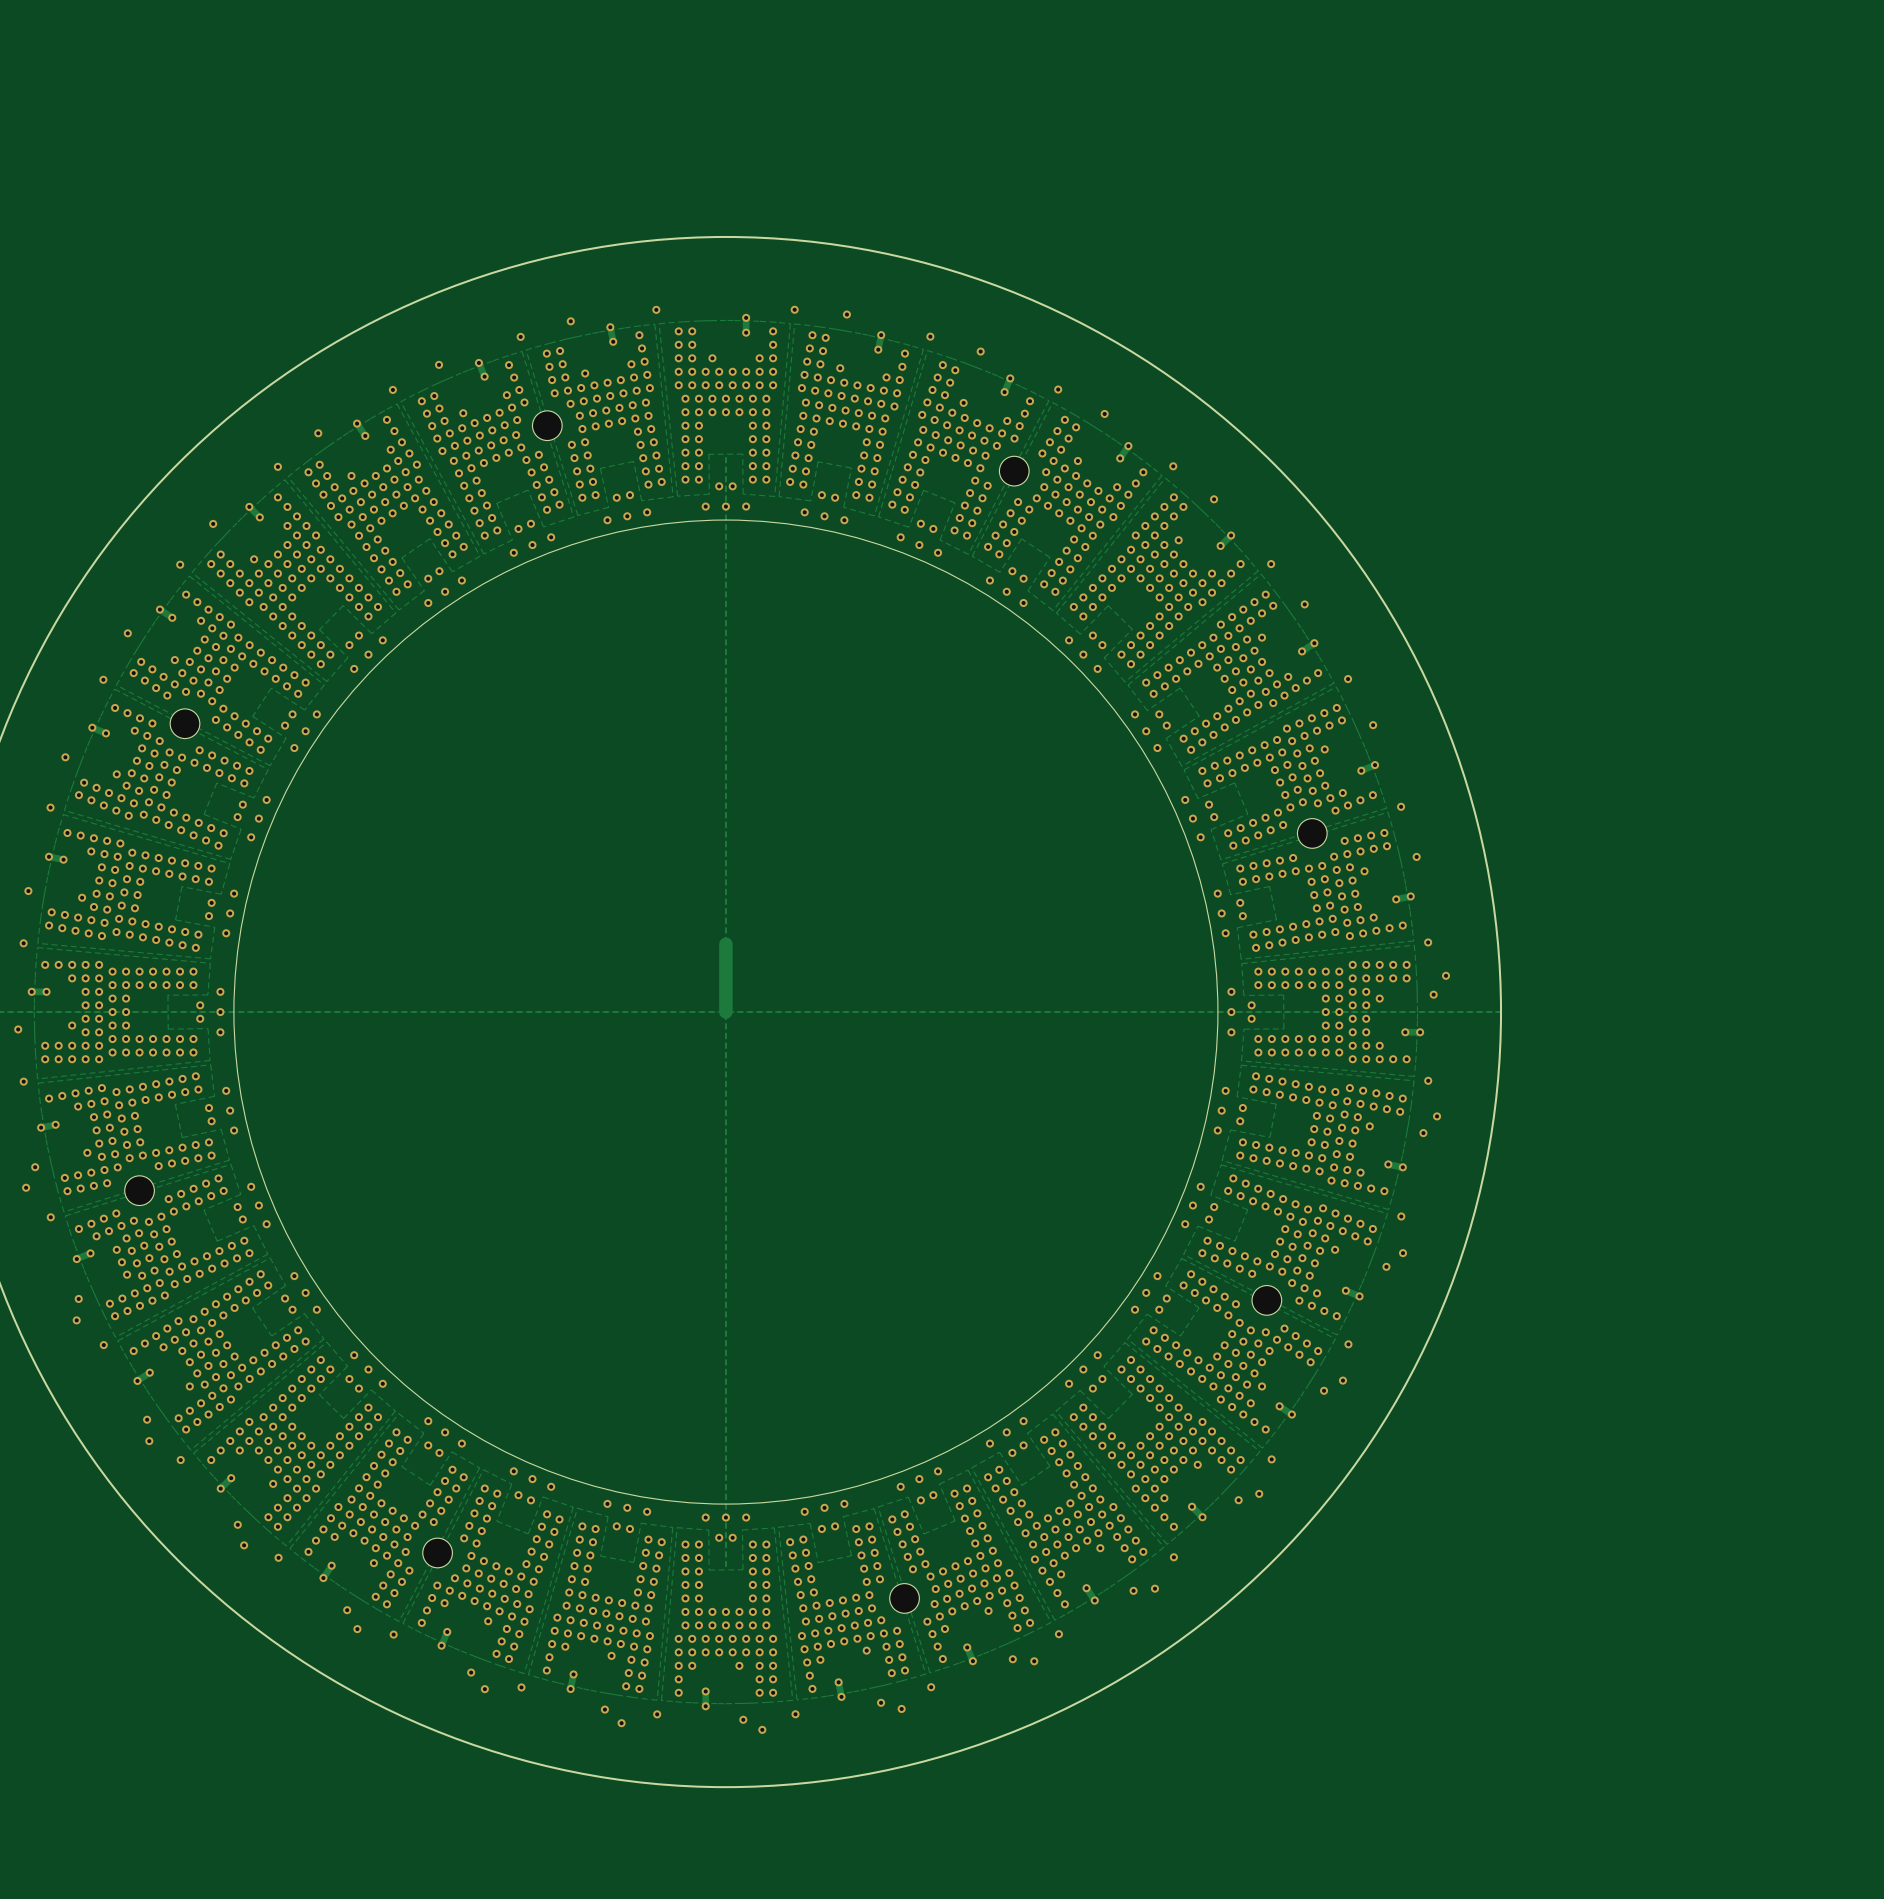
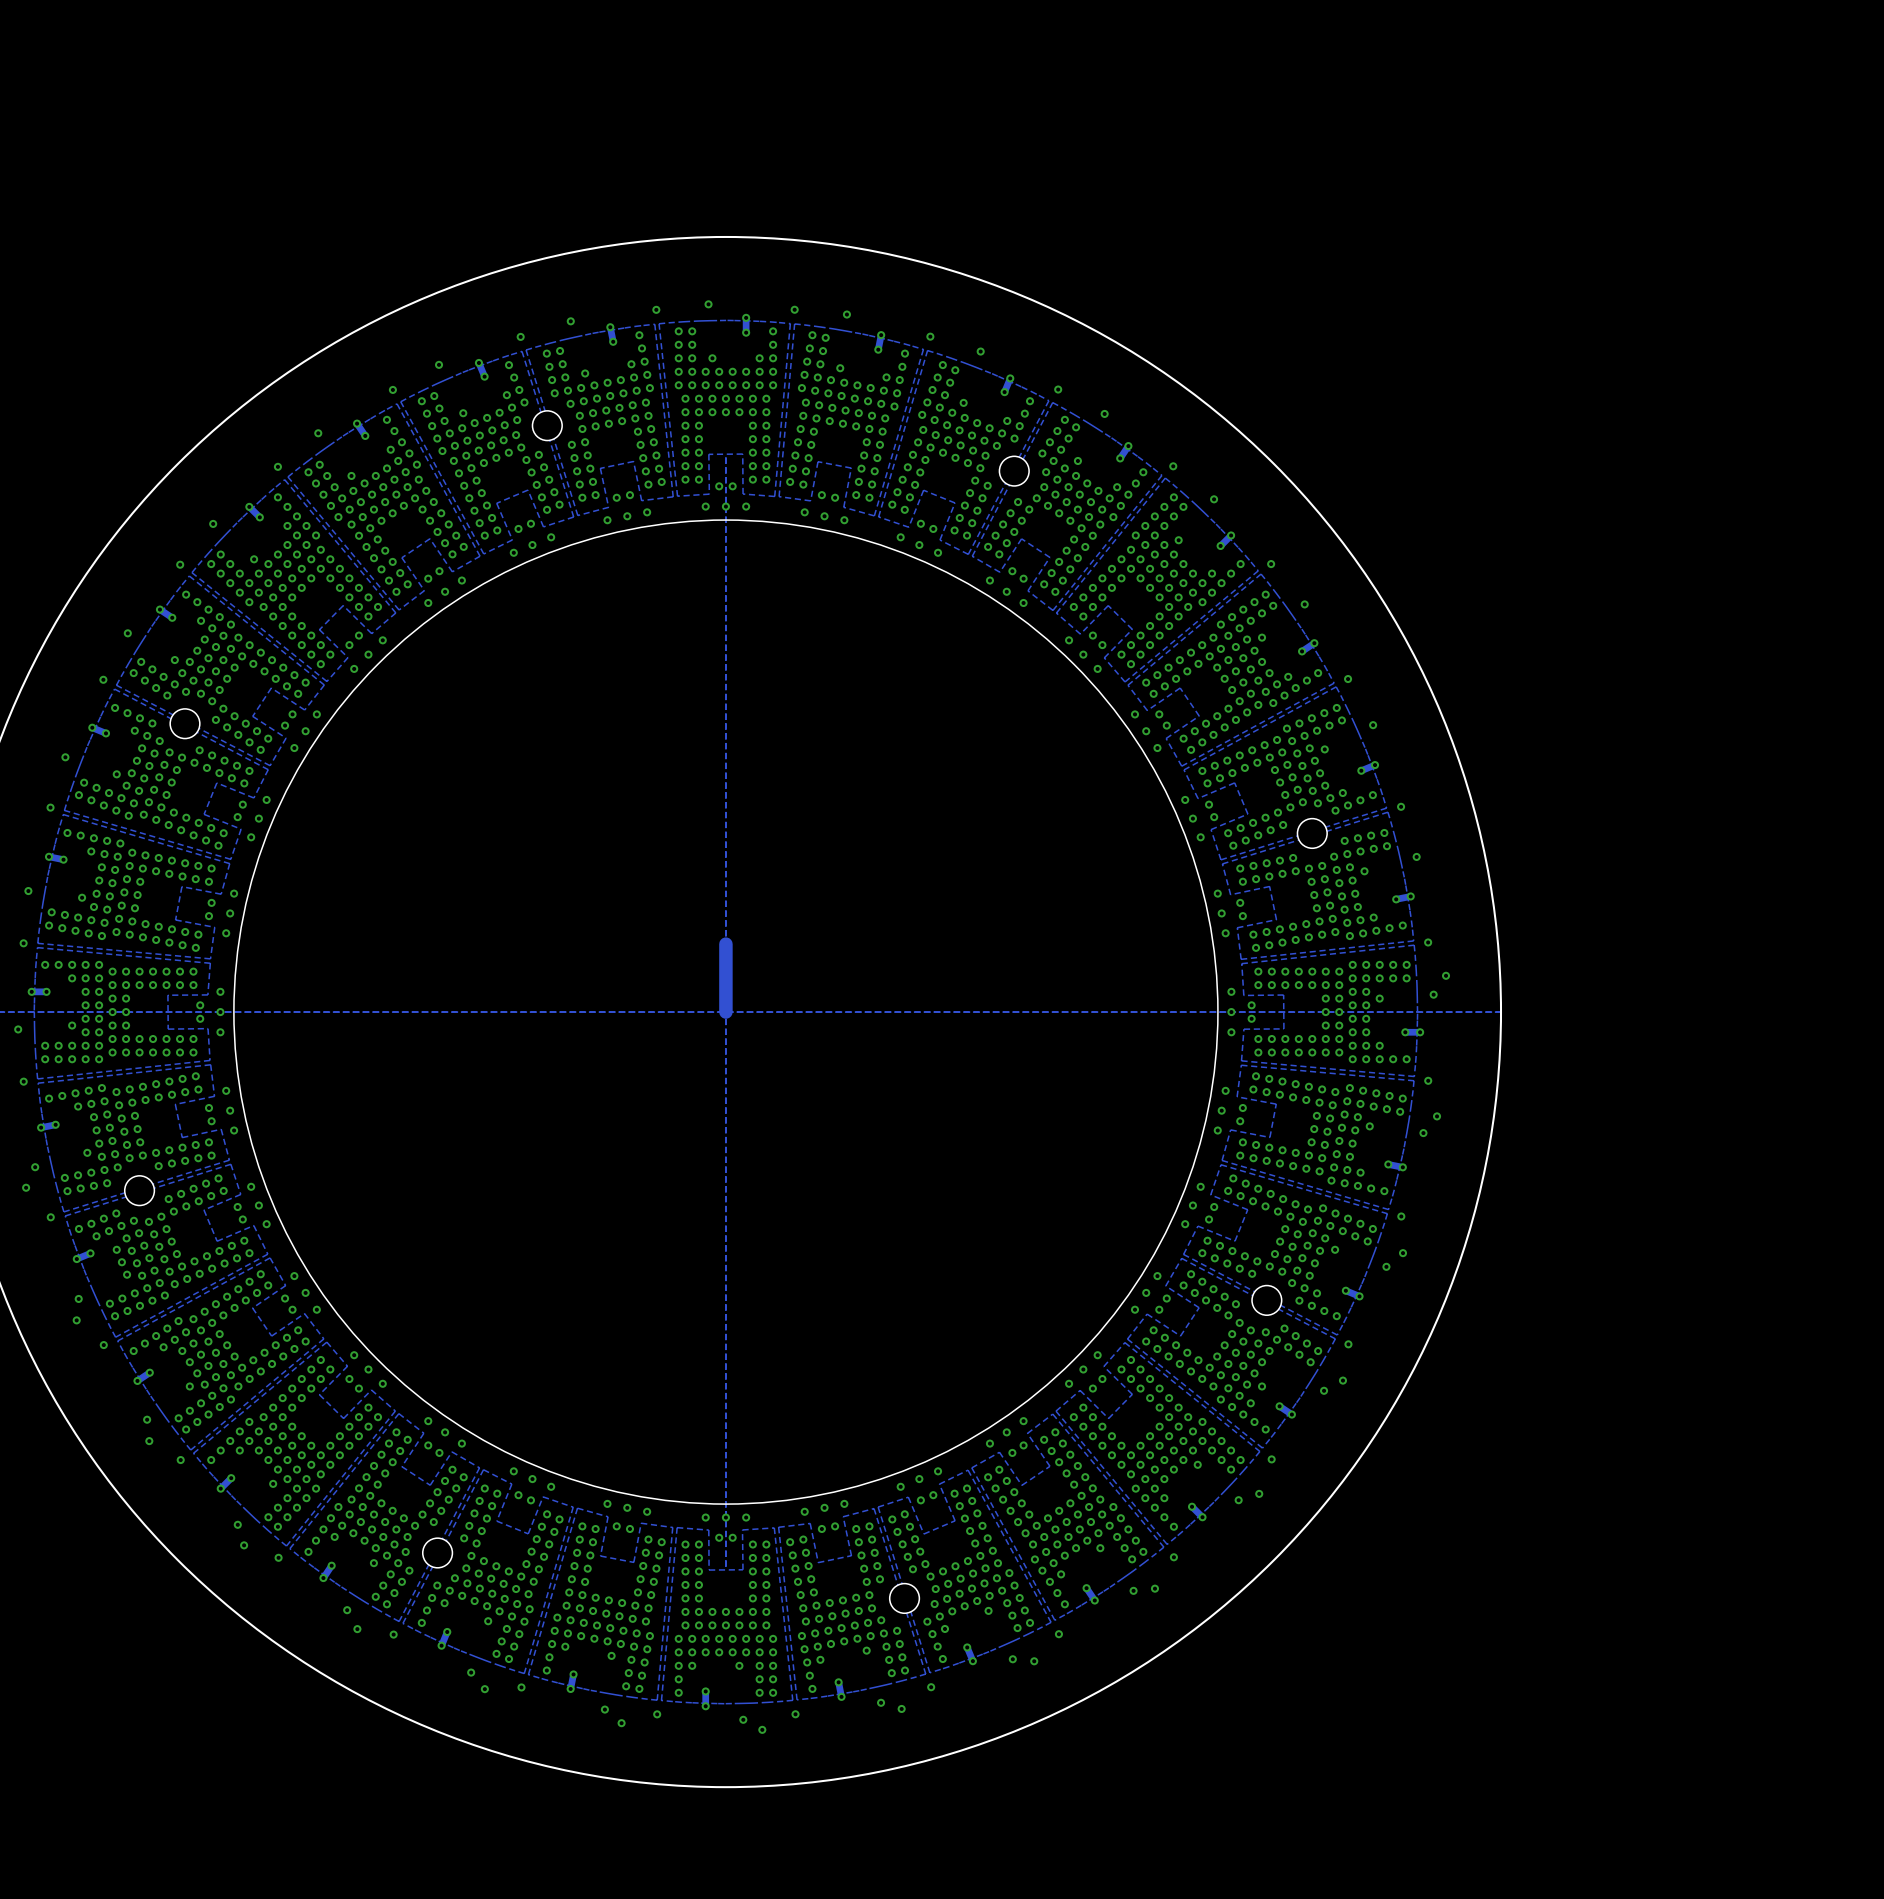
via: none -> (708, 304)

